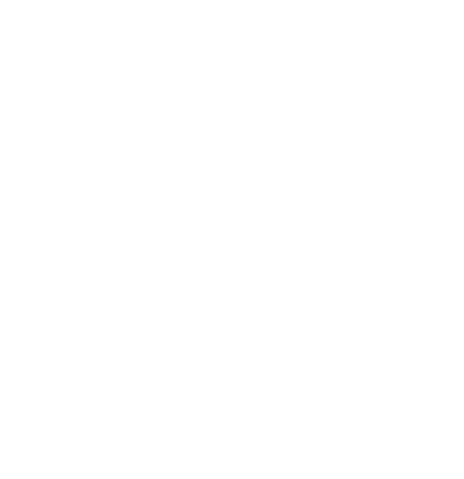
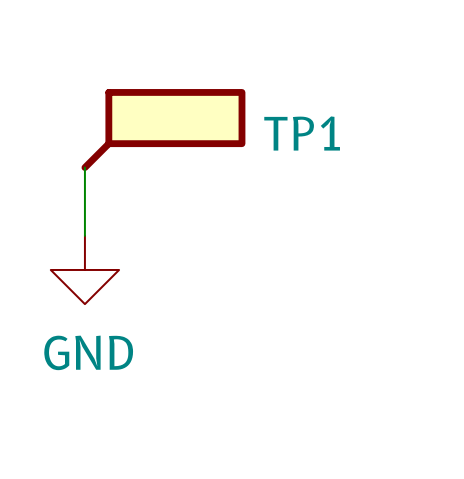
TP1: none -> (163, 130)
wire: none -> (84, 167) (84, 235)
power symbol: none -> GND (84, 269)

